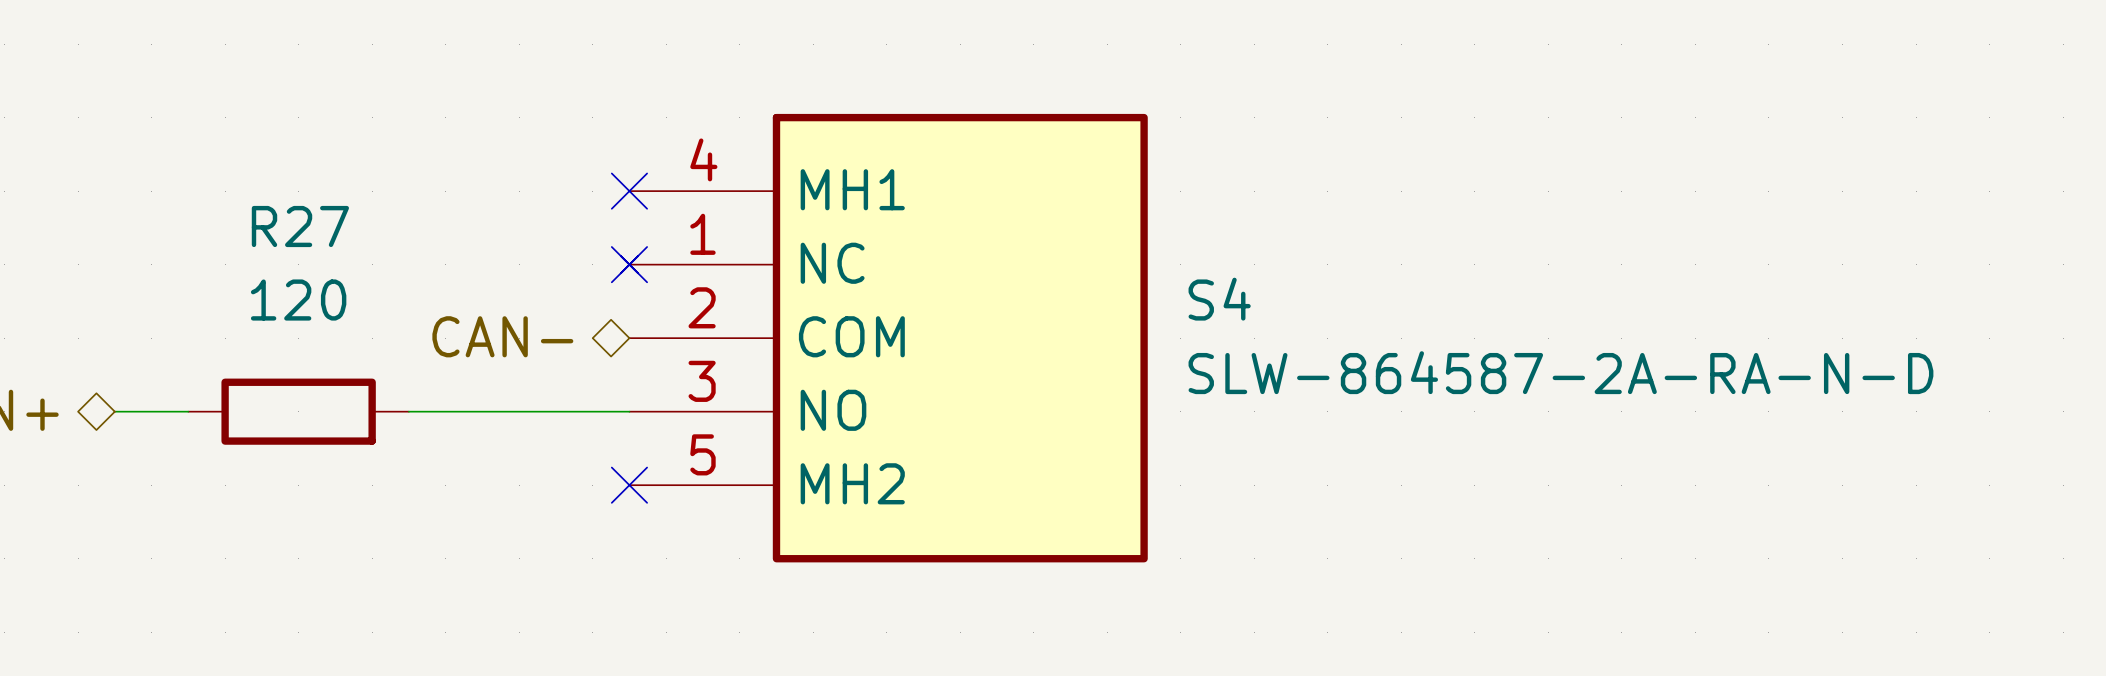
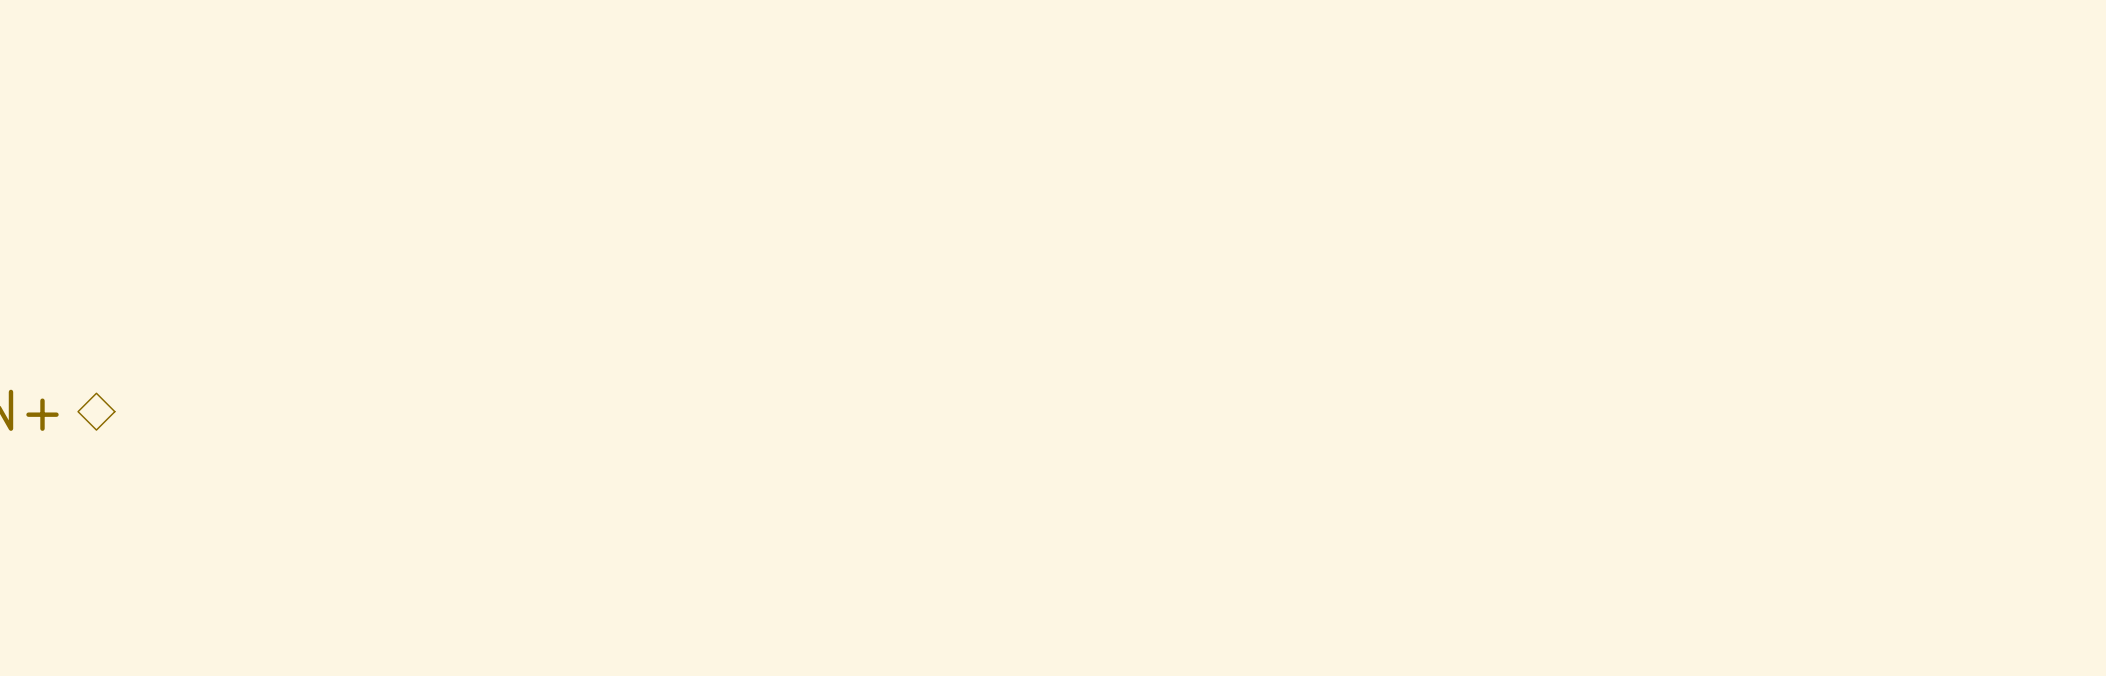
no-connect mark: (629, 191) -> none
no-connect mark: (629, 264) -> none
hierarchical label: CAN- (502, 336) -> none
S4: SLW-864587-2A-RA-N-D (884, 338) -> none
wire: (114, 411) (188, 411) -> none
R27: 120 (298, 411) -> none
wire: (408, 411) (629, 411) -> none
no-connect mark: (629, 485) -> none

